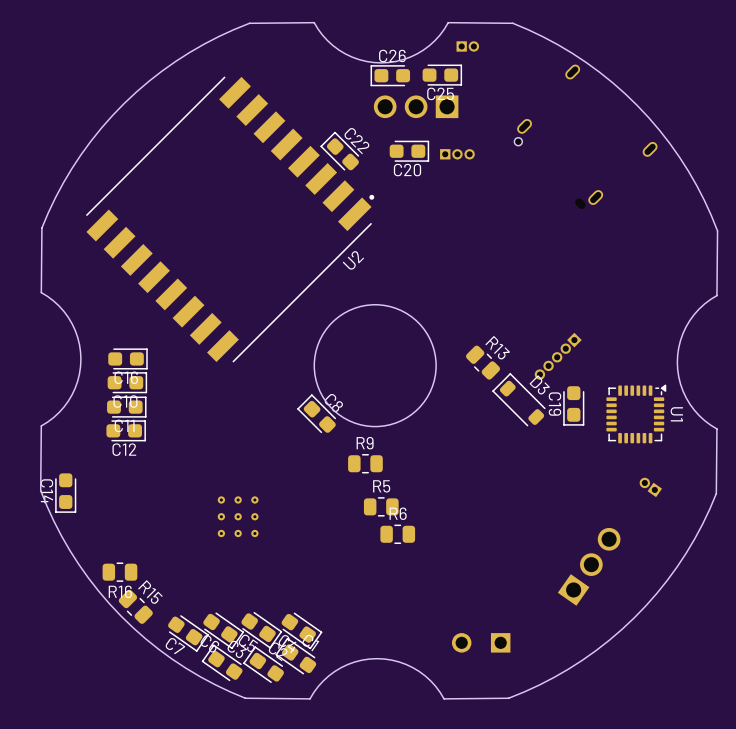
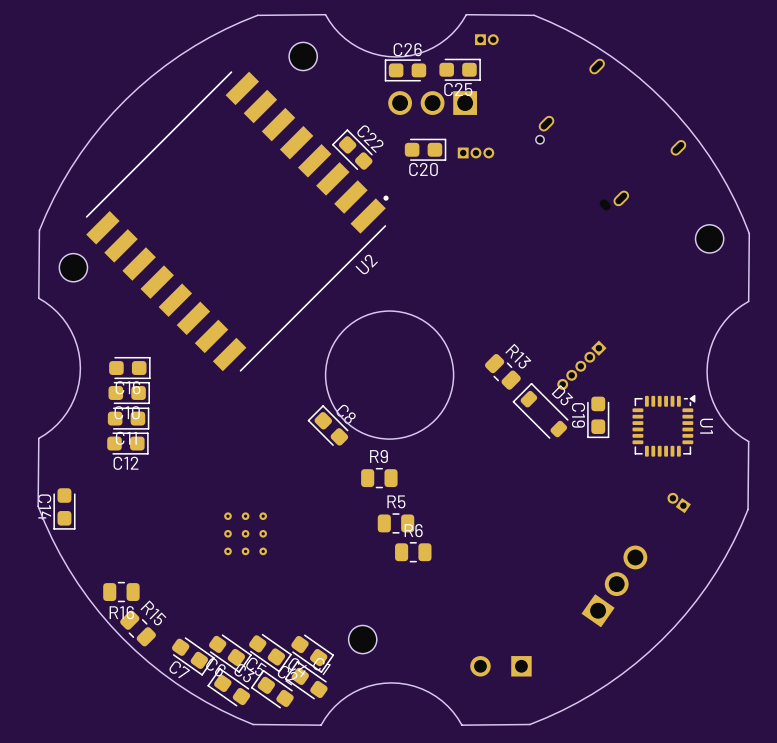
part: none -> (303, 56)
part: none -> (709, 238)
part: none -> (73, 267)
part: none -> (362, 639)

